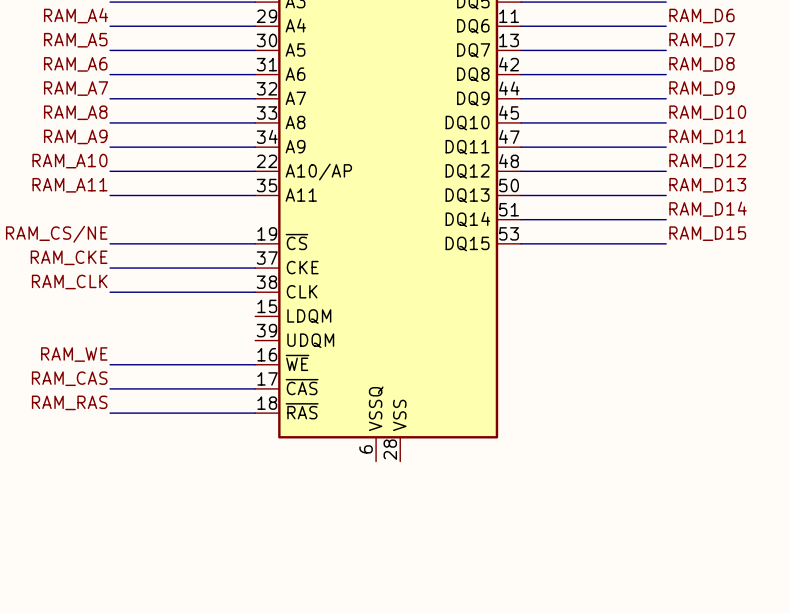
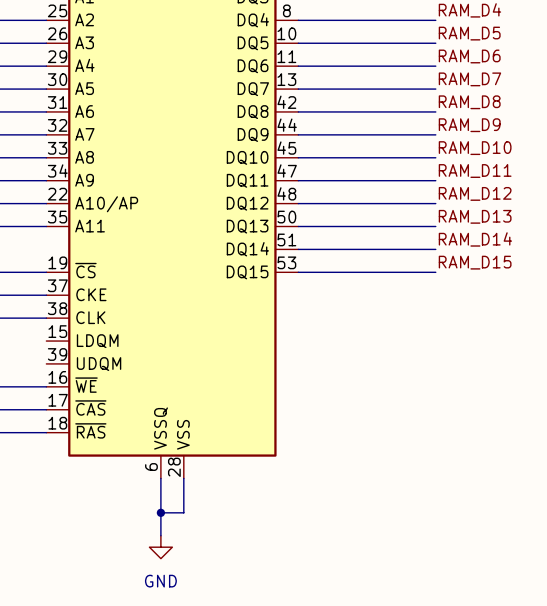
wire: none -> (160, 478) (160, 535)
wire: none -> (183, 478) (183, 512) (160, 512)
junction: none -> (160, 512)
power symbol: none -> GND (160, 547)

